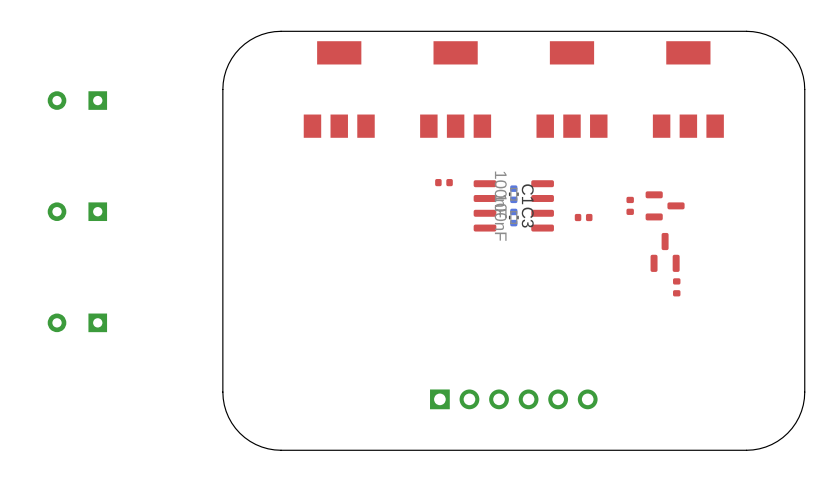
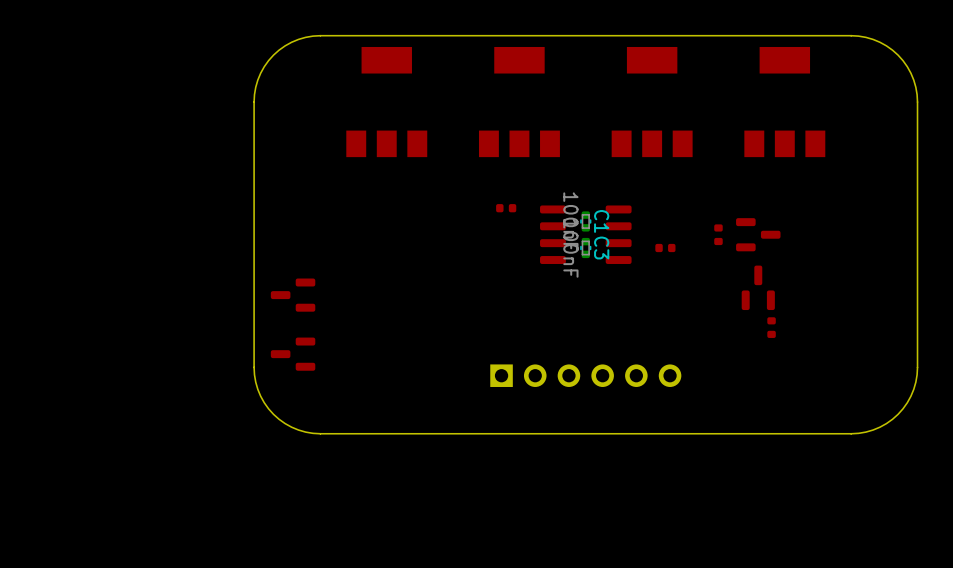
part: (77, 100) -> none
part: (77, 211) -> none
part: none -> (293, 295)
part: none -> (293, 354)
part: (77, 322) -> none
board edge: (804, 322) (804, 398) (798, 417) (787, 433) (777, 441) (765, 447) (746, 450) (268, 448) (250, 441) (239, 433) (226, 411) (222, 392) (222, 322) -> (917, 367) (915, 382) (910, 396) (898, 414) (879, 427) (865, 432) (851, 433) (313, 433) (291, 427) (273, 414) (264, 402) (257, 389) (254, 367)
part position: (513, 399) -> (585, 375)

